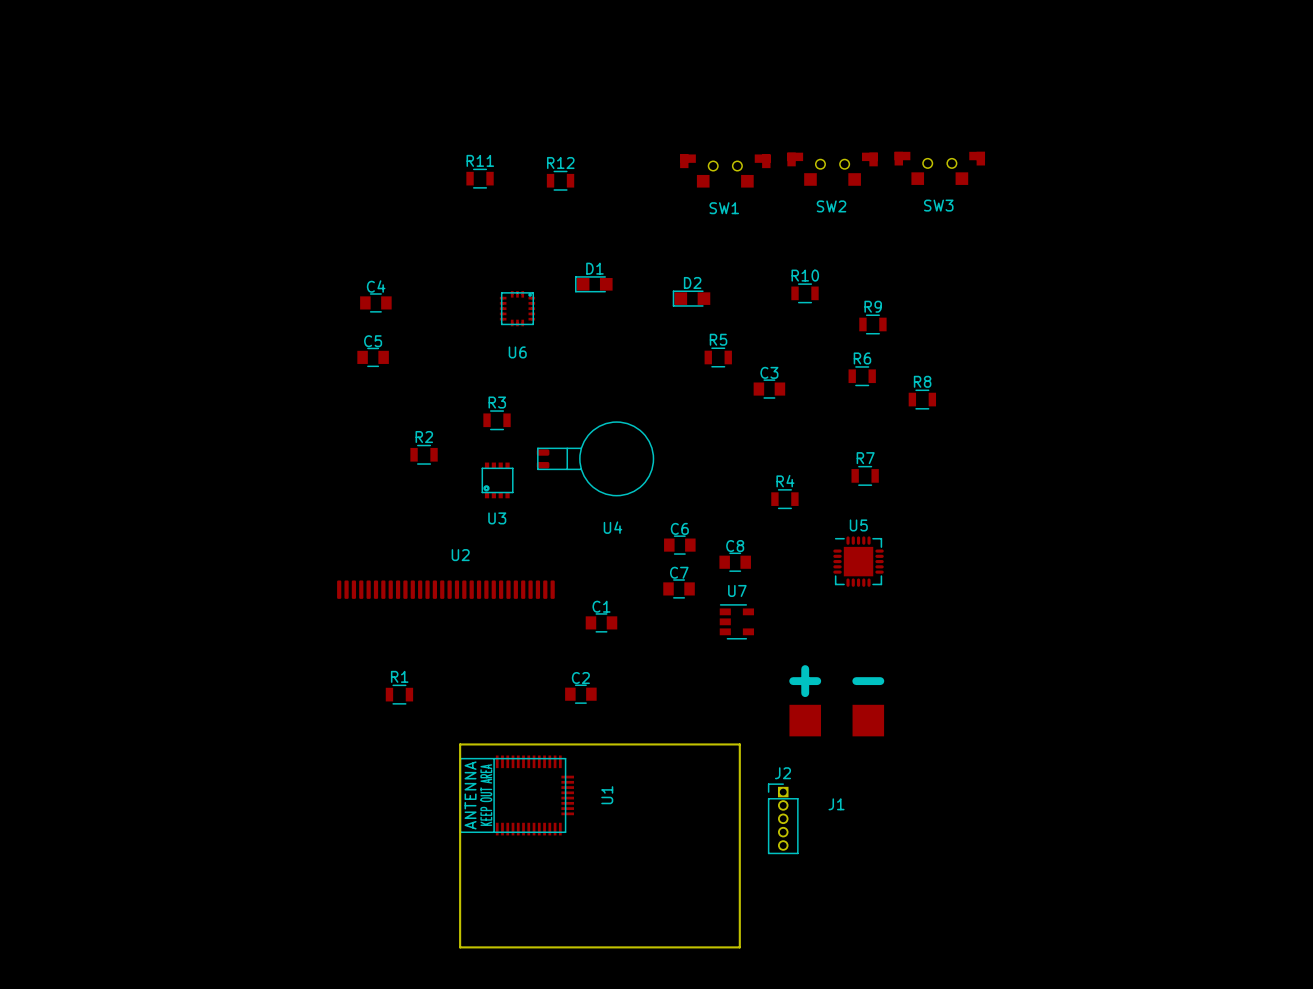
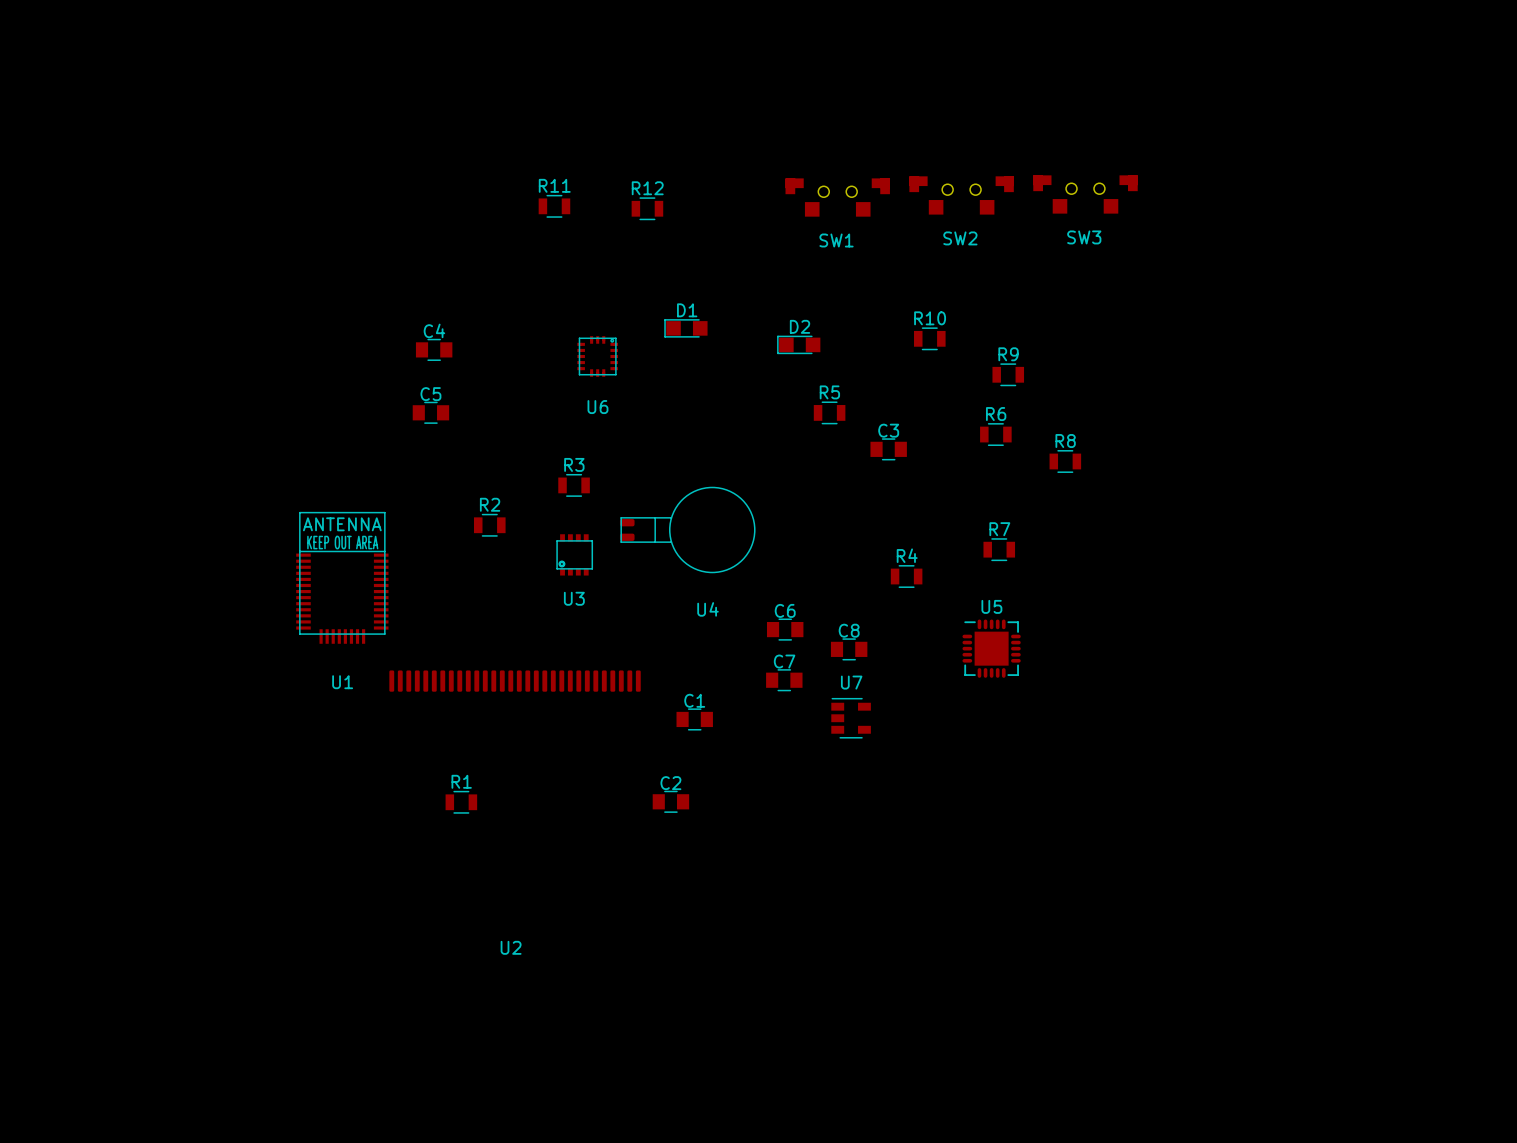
U2 name position: U2 (460, 555) -> U2 (511, 947)
J1: (836, 720) -> none
board edge: (460, 744) (460, 947) (739, 947) (739, 744) (460, 744) -> none
U1 rotation: 0° (516, 795) -> 90° clockwise (342, 577)
U1 position: (516, 795) -> (342, 577)
J2: (783, 818) -> none

